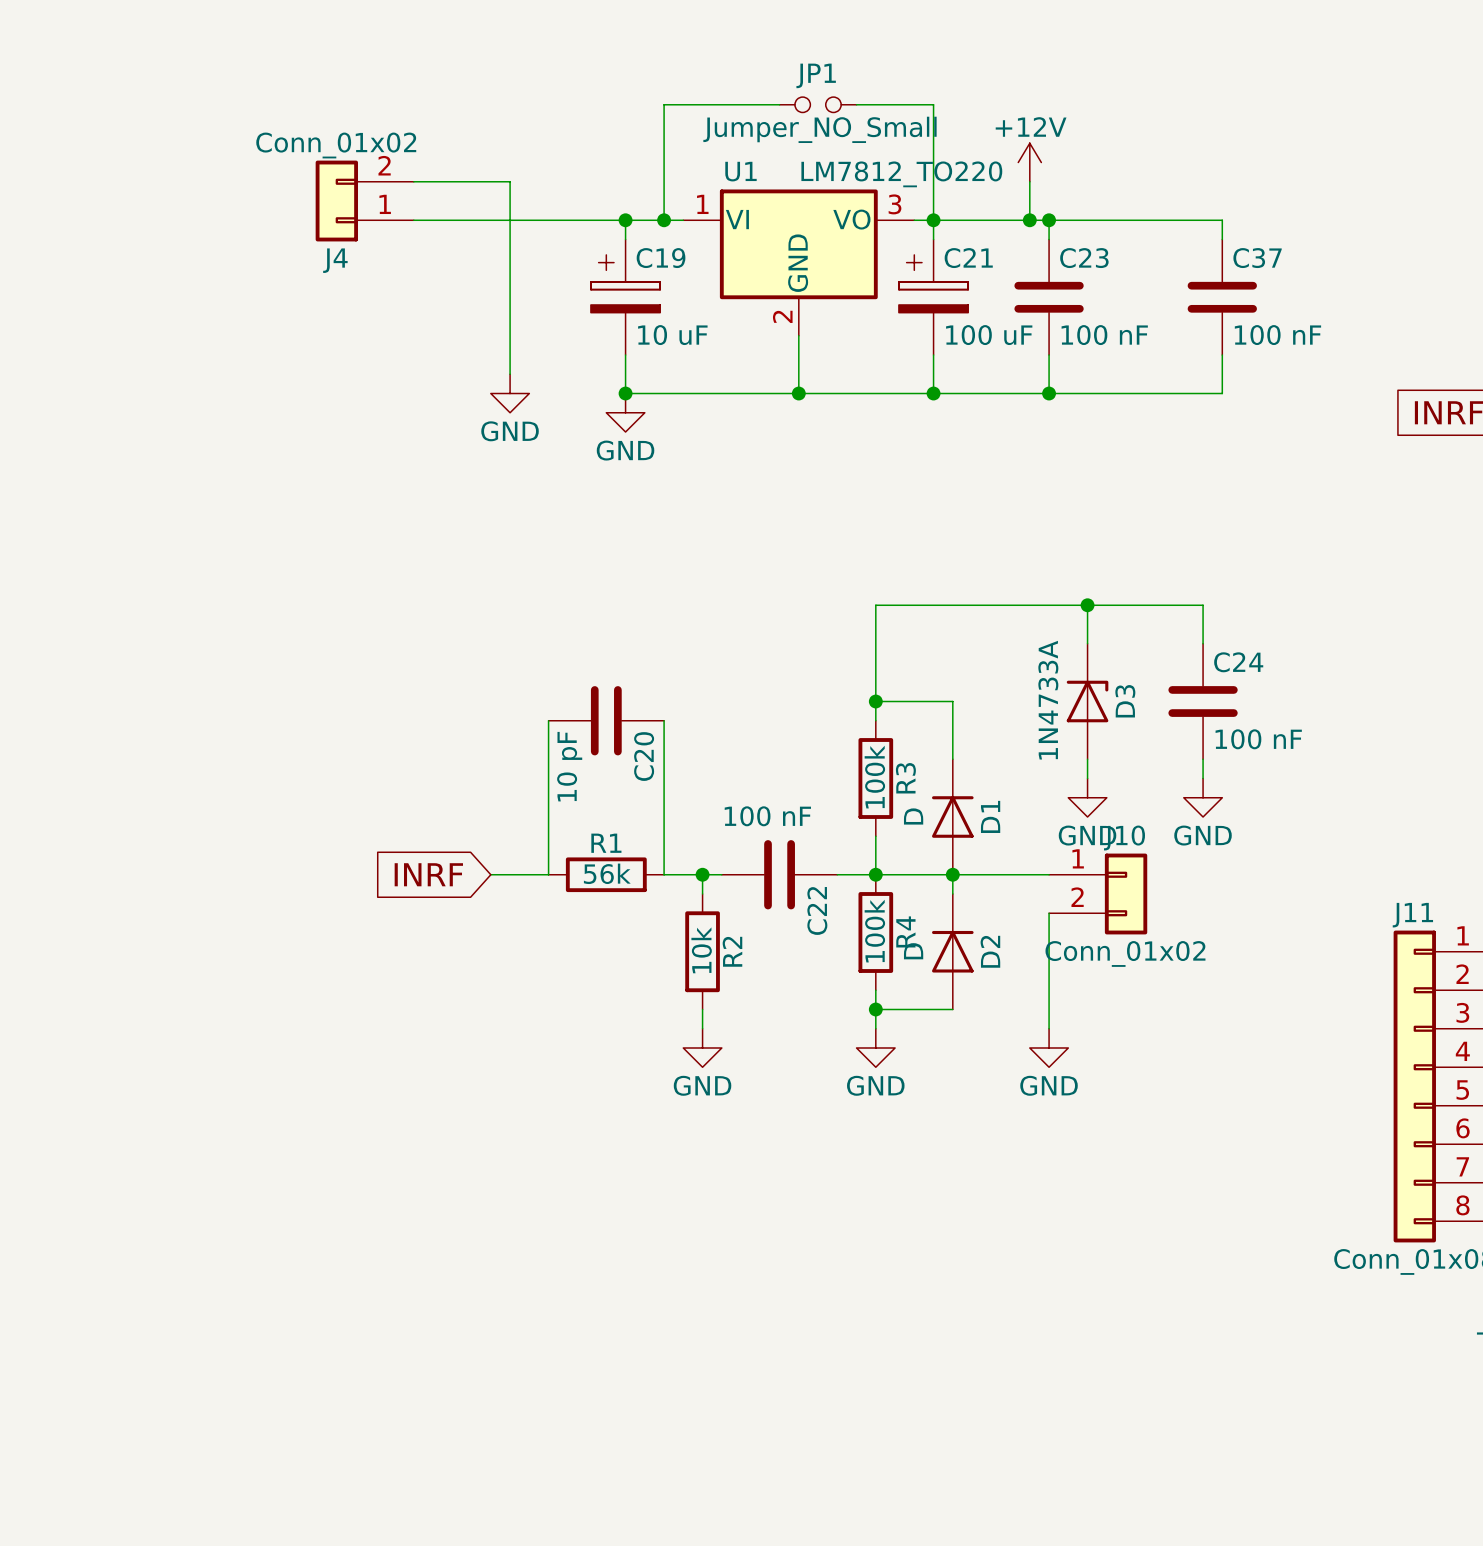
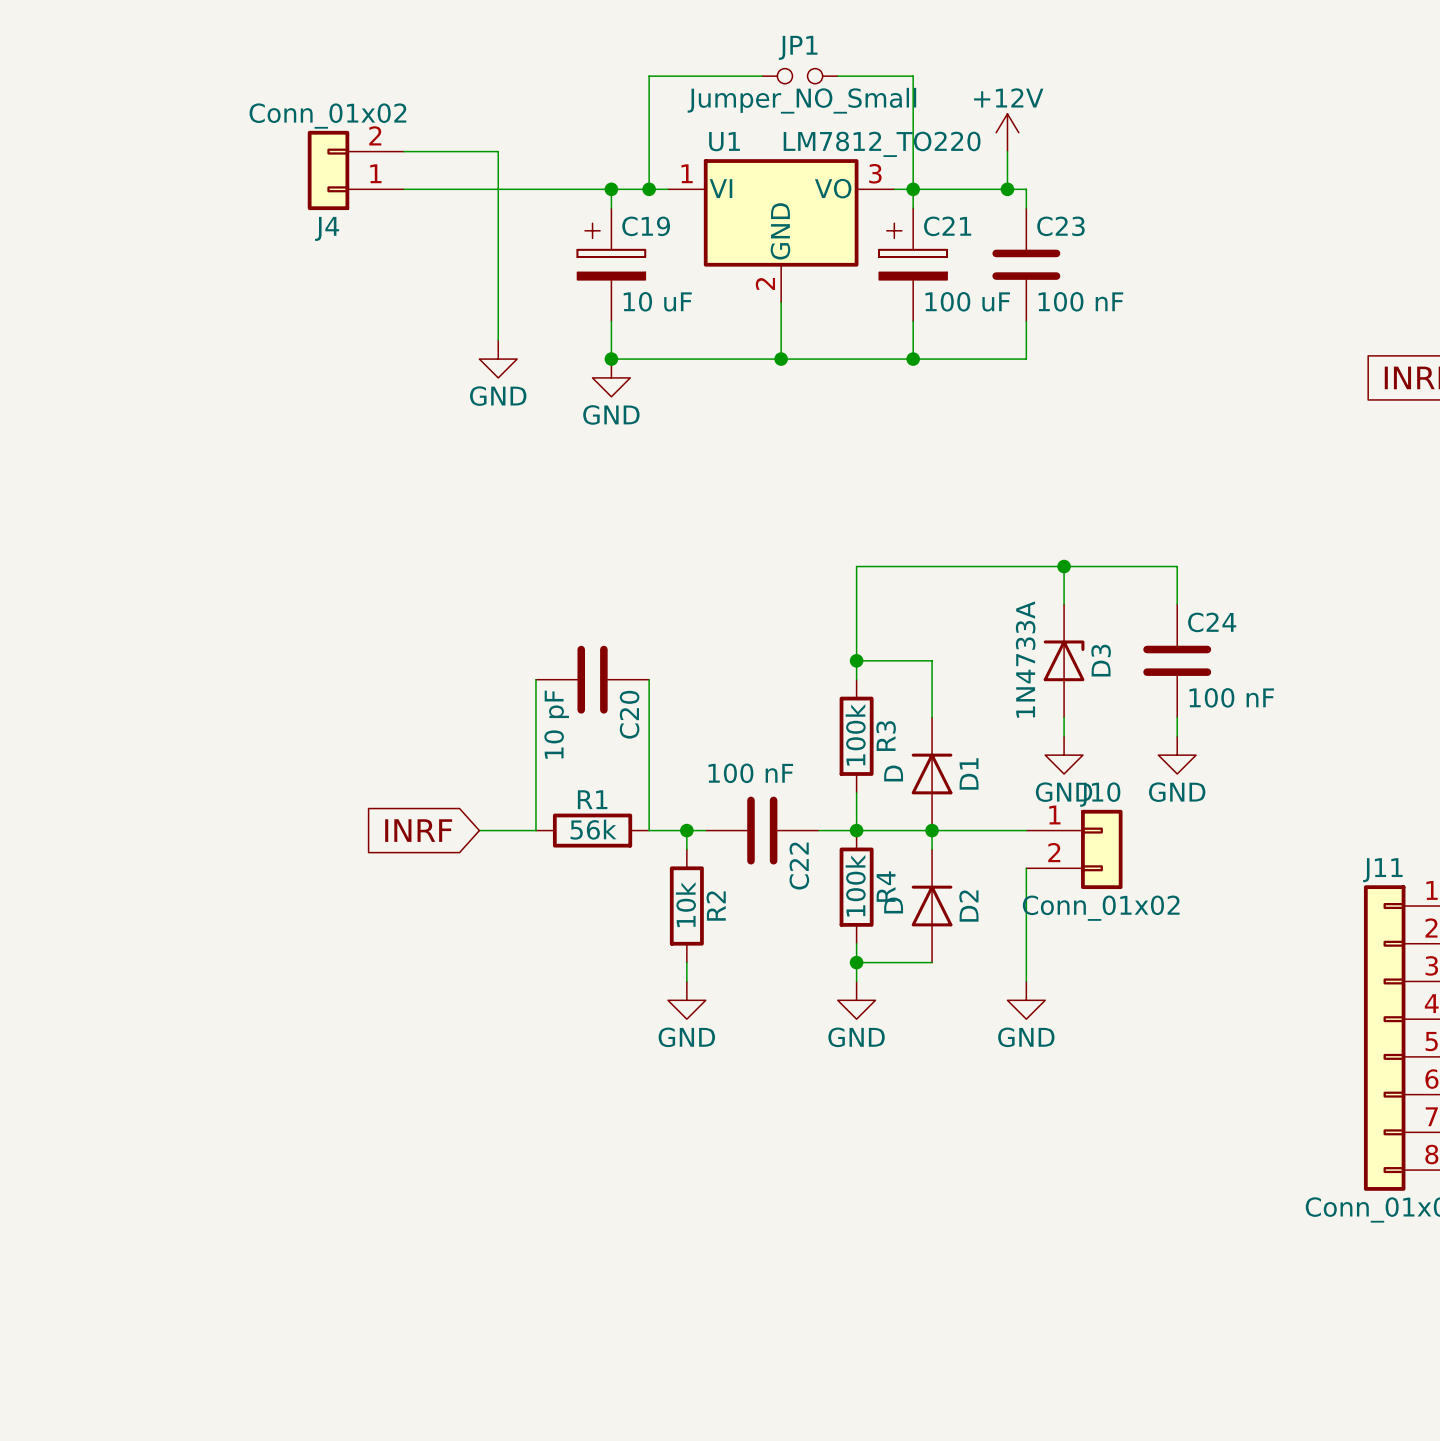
wire: (1049, 220) (1222, 220) (1222, 239) -> none
junction: (1049, 220) -> none
C37: 100 nF (1222, 297) -> none
wire: (1222, 355) (1222, 393) (1049, 393) -> none
junction: (1049, 393) -> none

